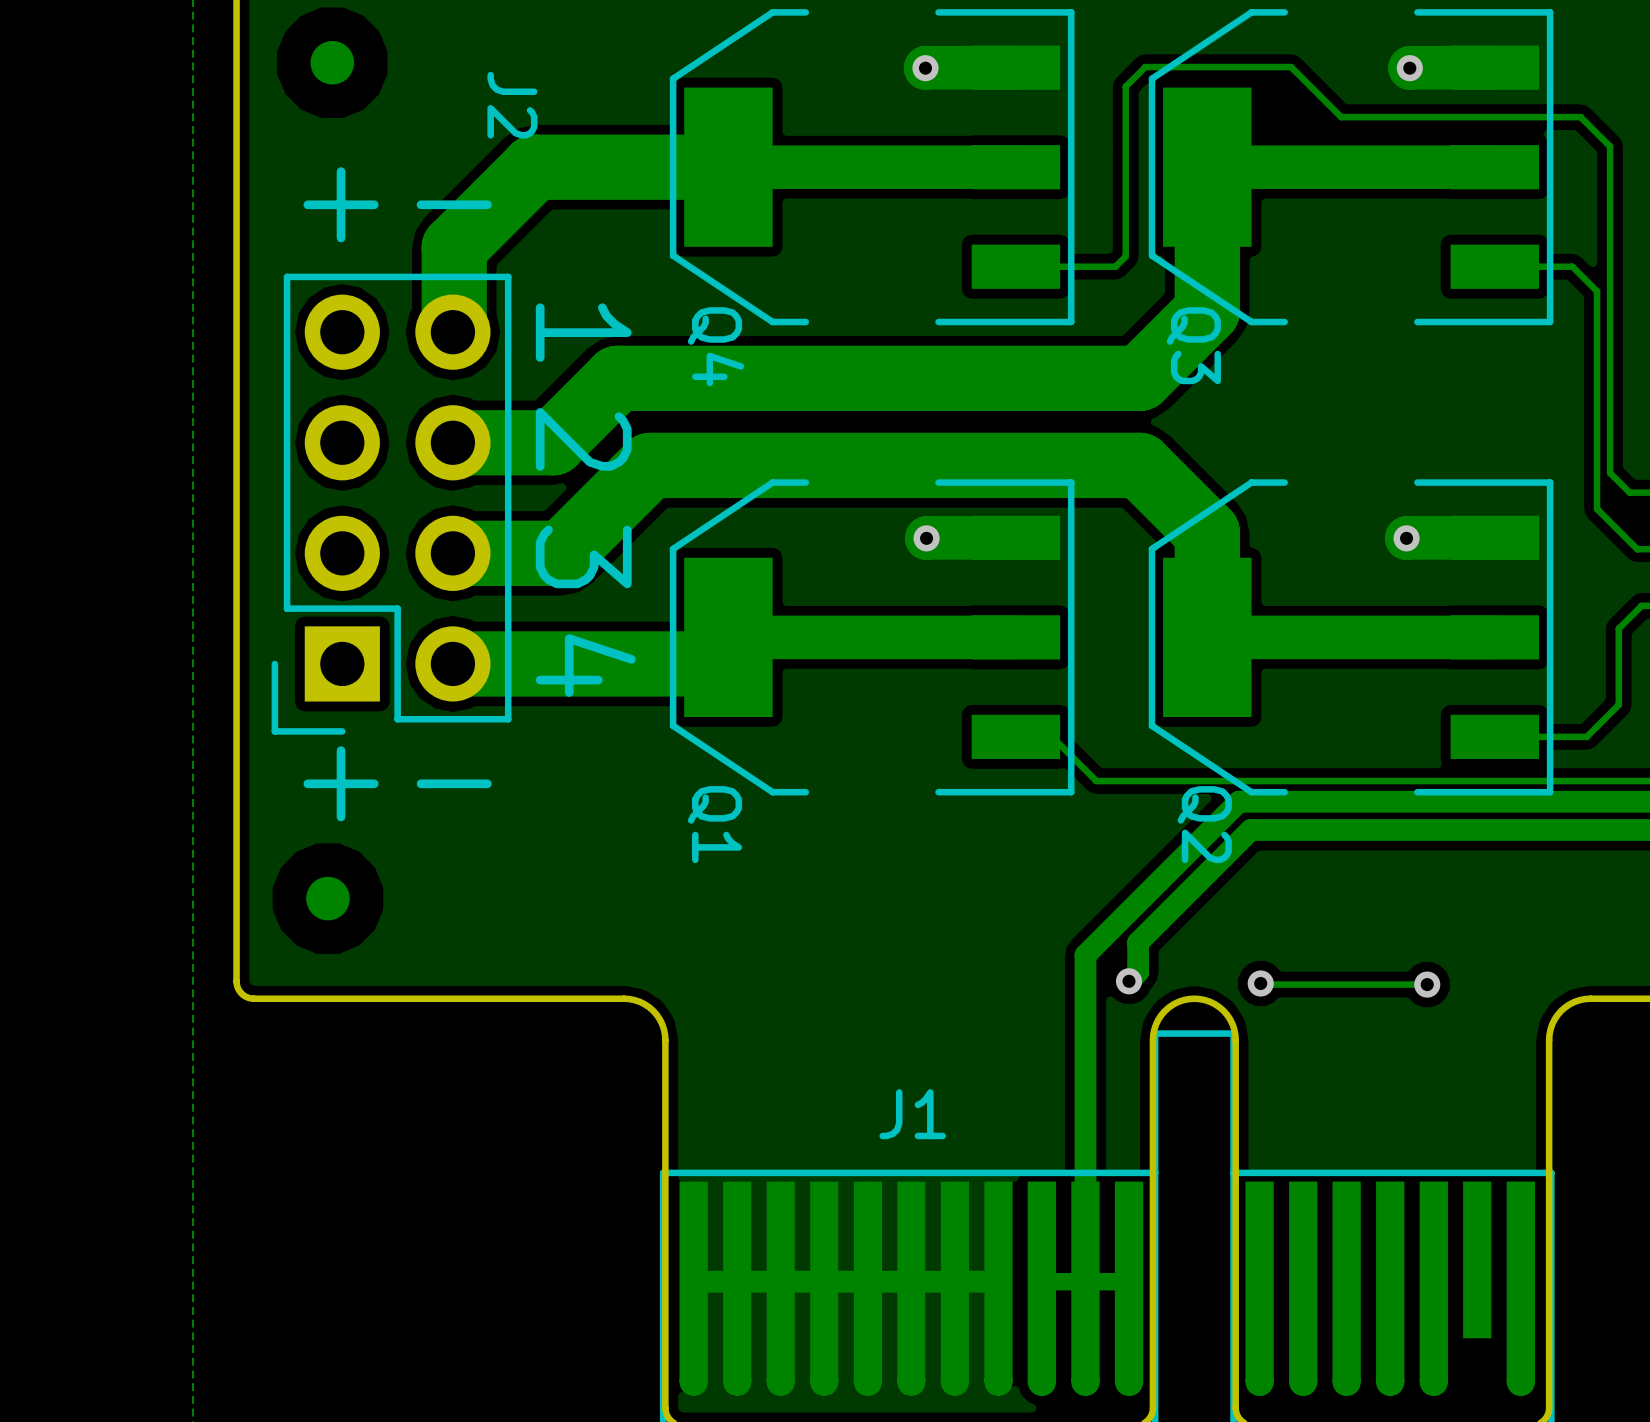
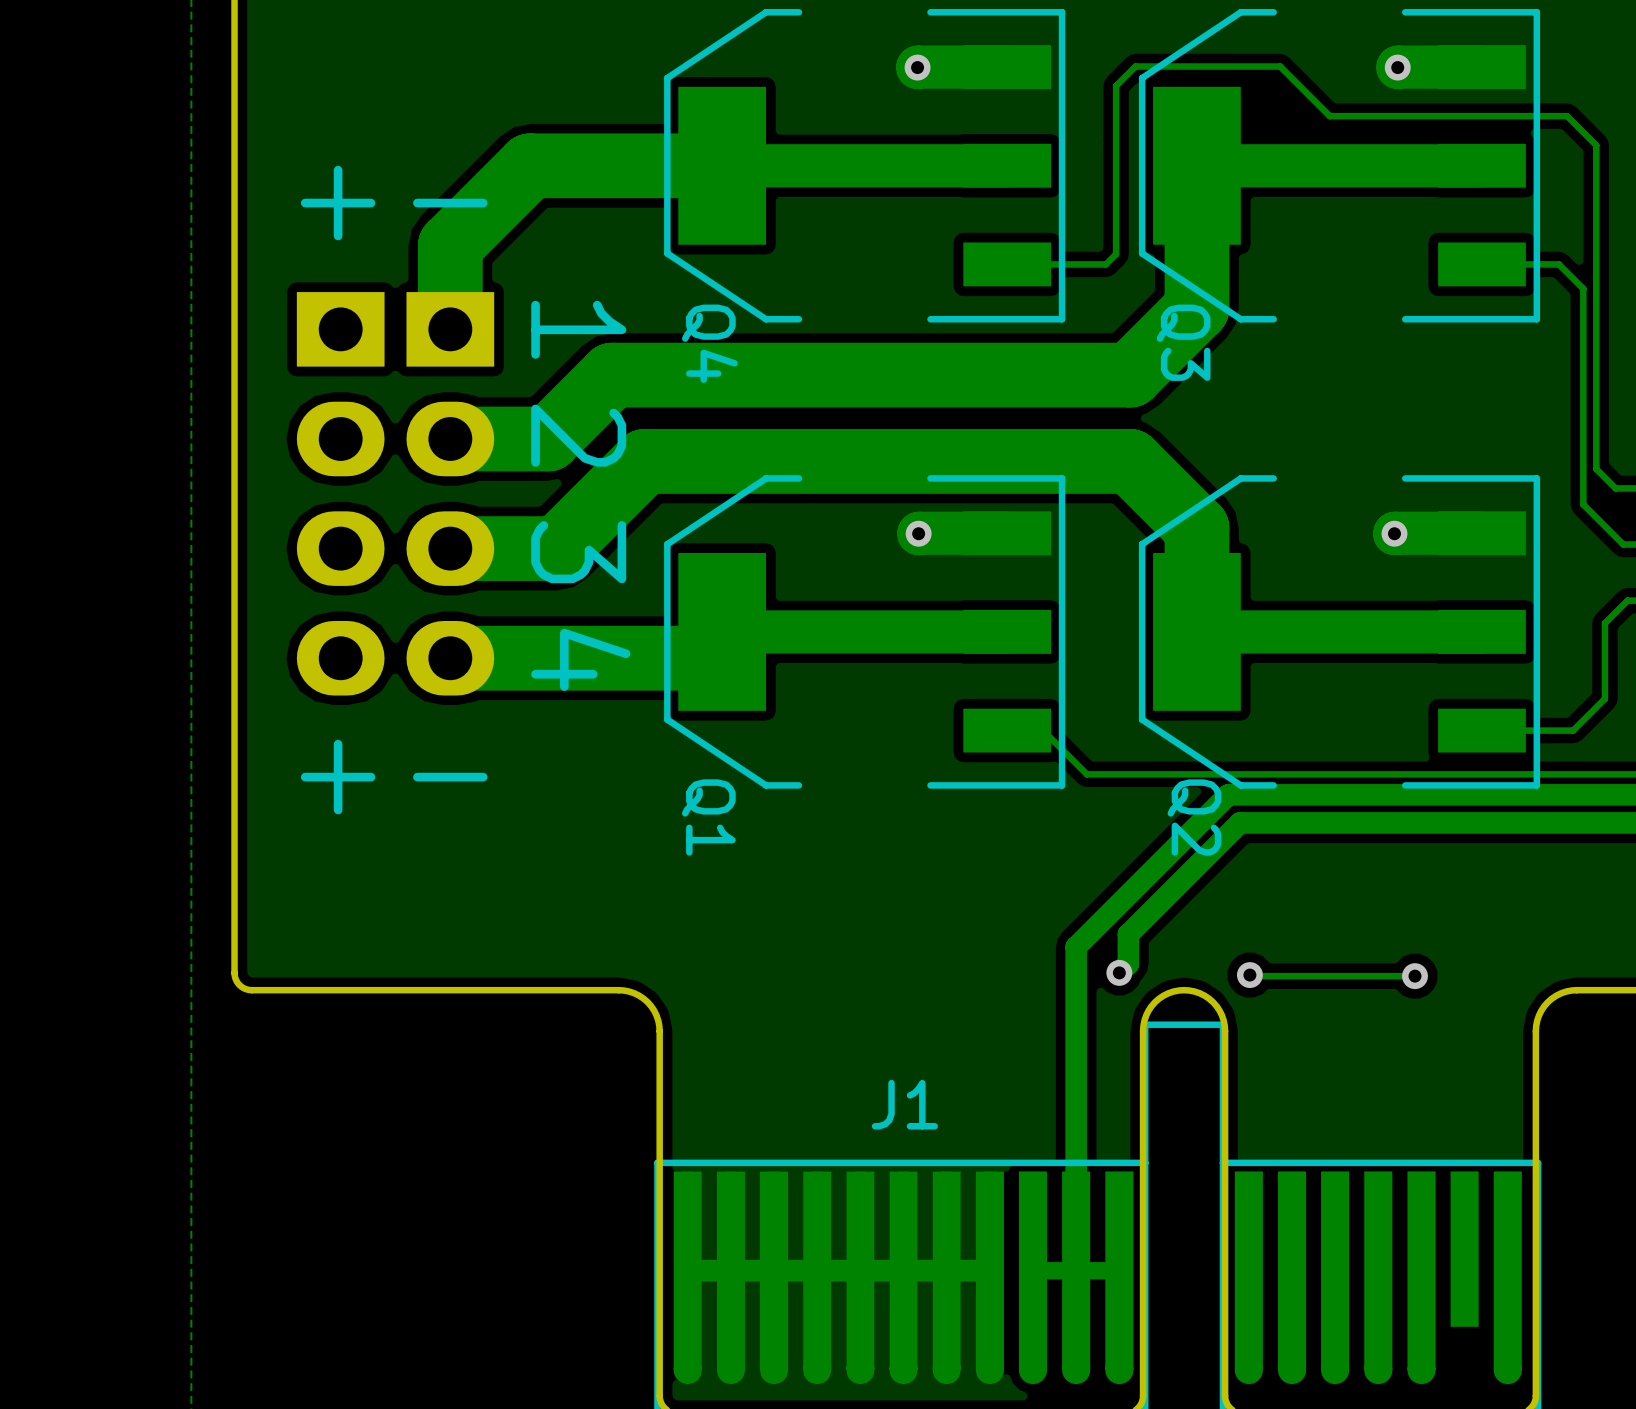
part: (332, 62) -> none
part: none -> (340, 493)
part: none -> (450, 493)
J2: (391, 504) -> none
part: (327, 898) -> none

